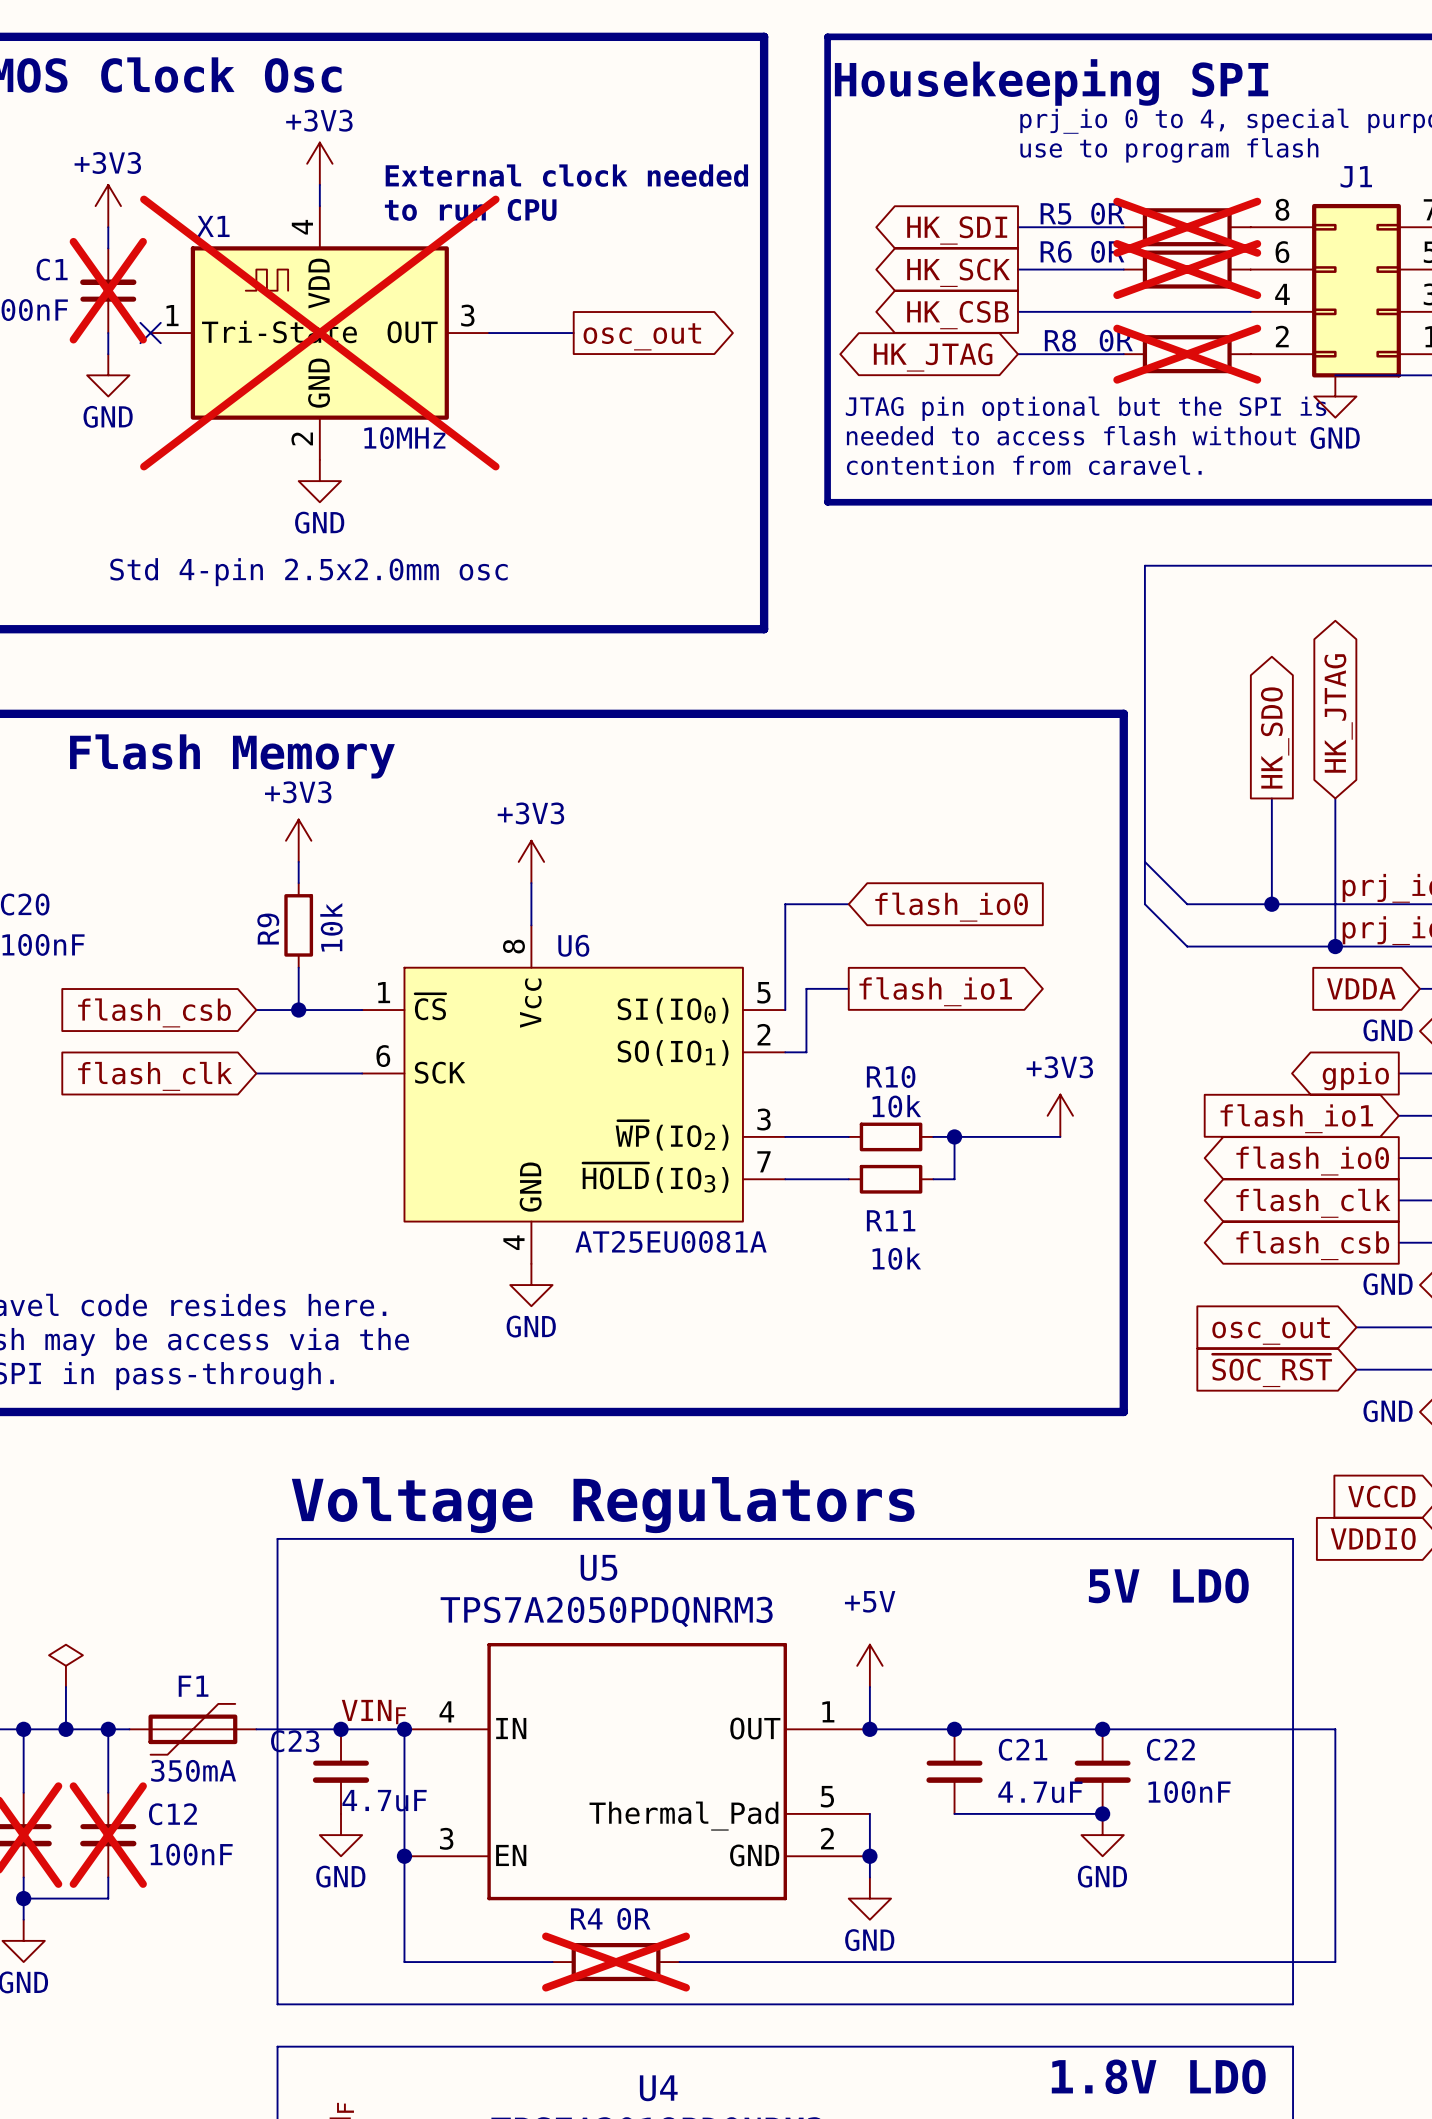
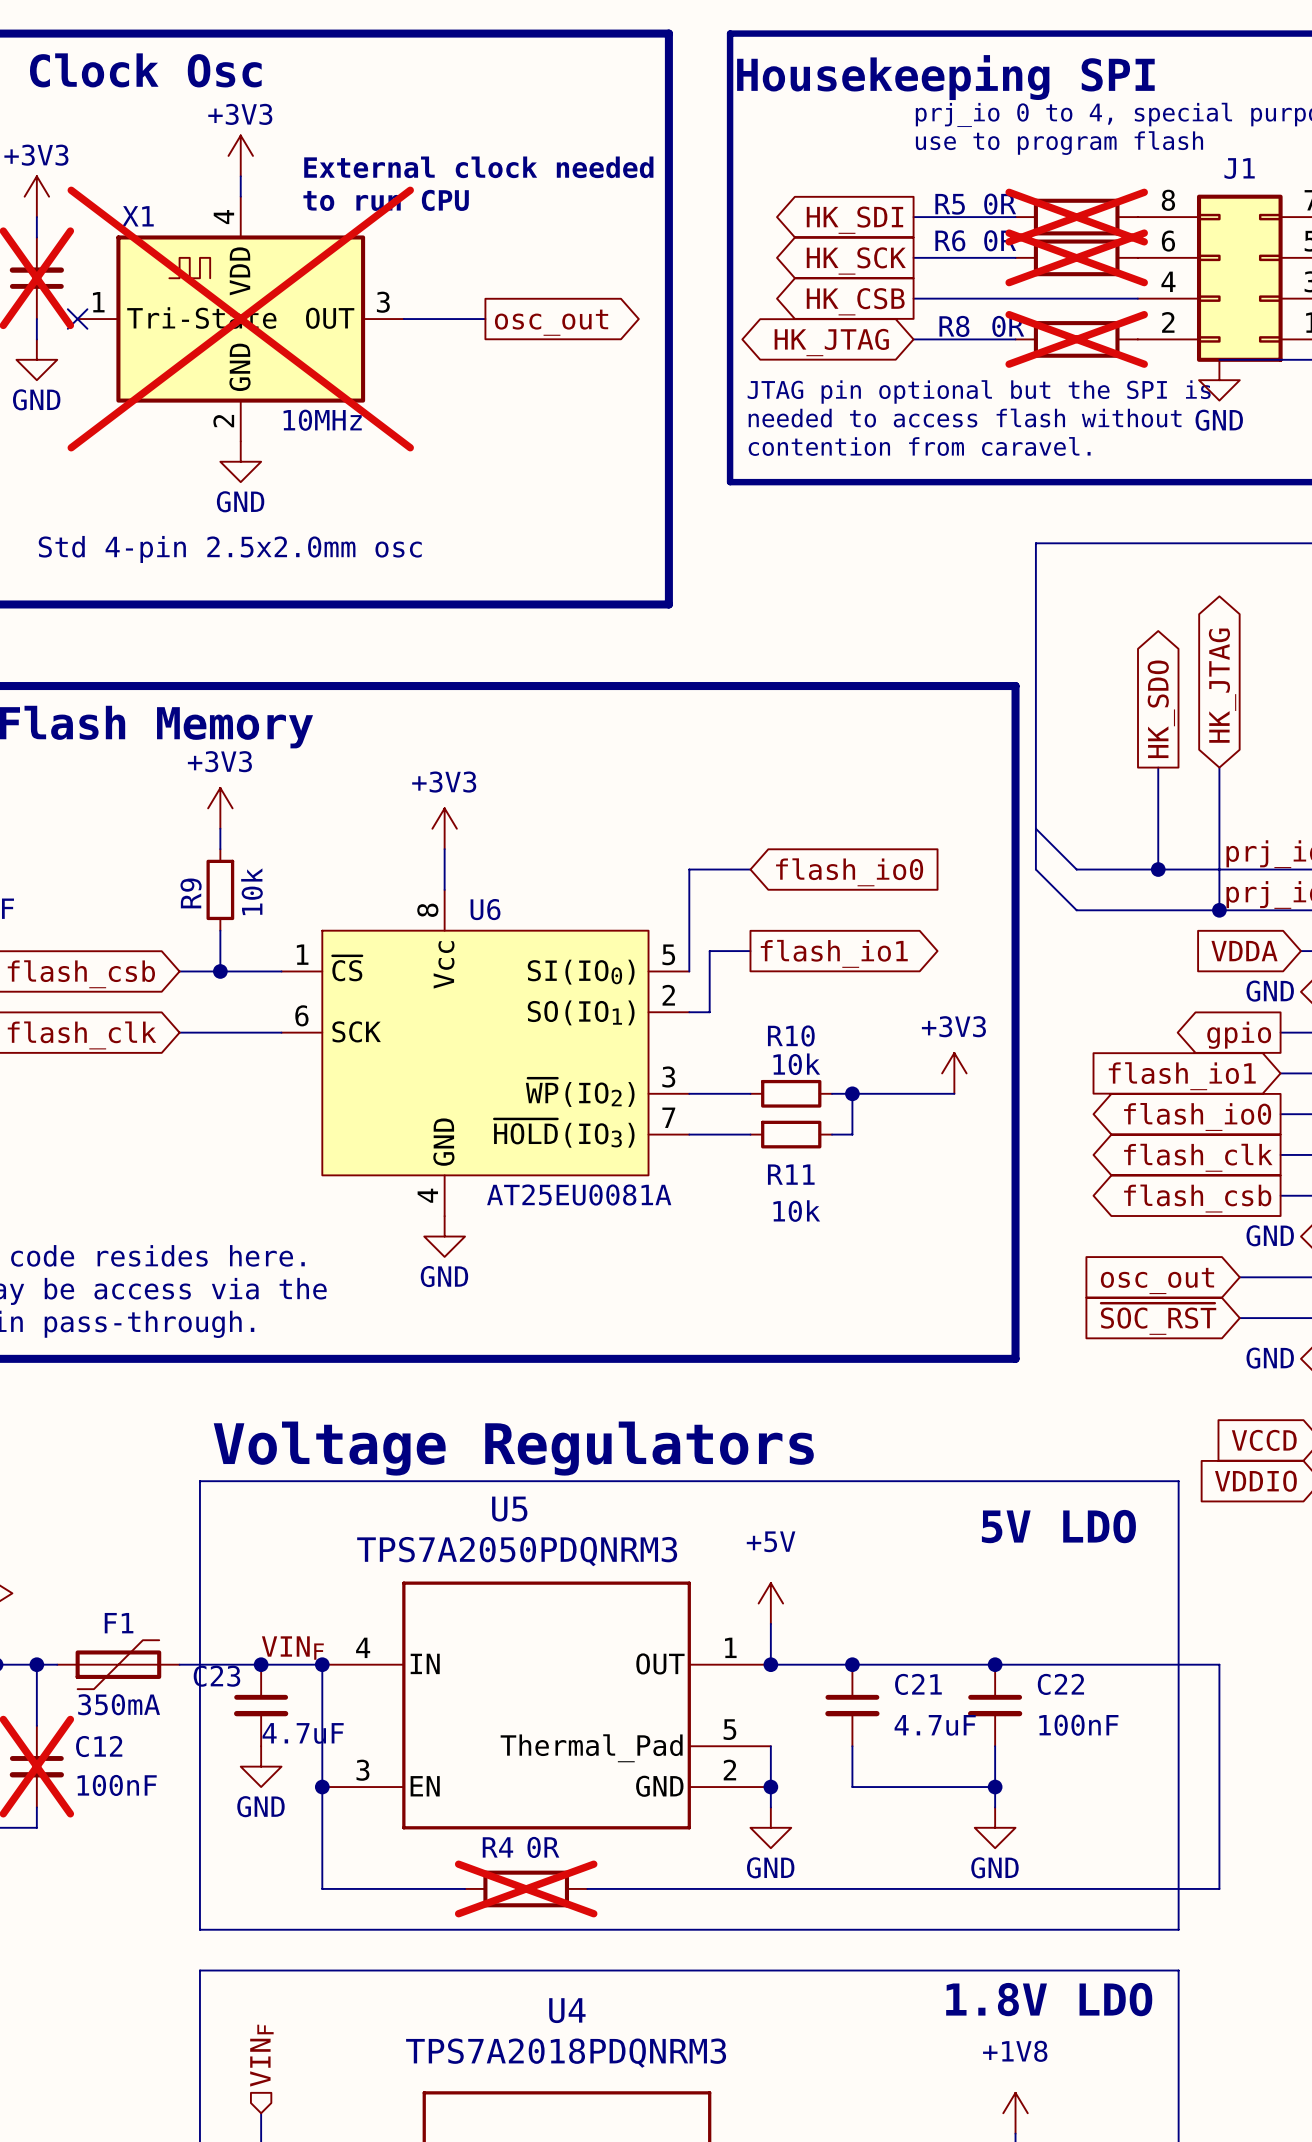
wire: (954, 1813) (1102, 1813) -> (852, 1746) (852, 1787) (995, 1787)
wire: none -> (995, 1746) (995, 1807)
junction position: (1102, 1813) -> (995, 1787)
power symbol position: GND (1102, 1835) -> GND (995, 1827)

